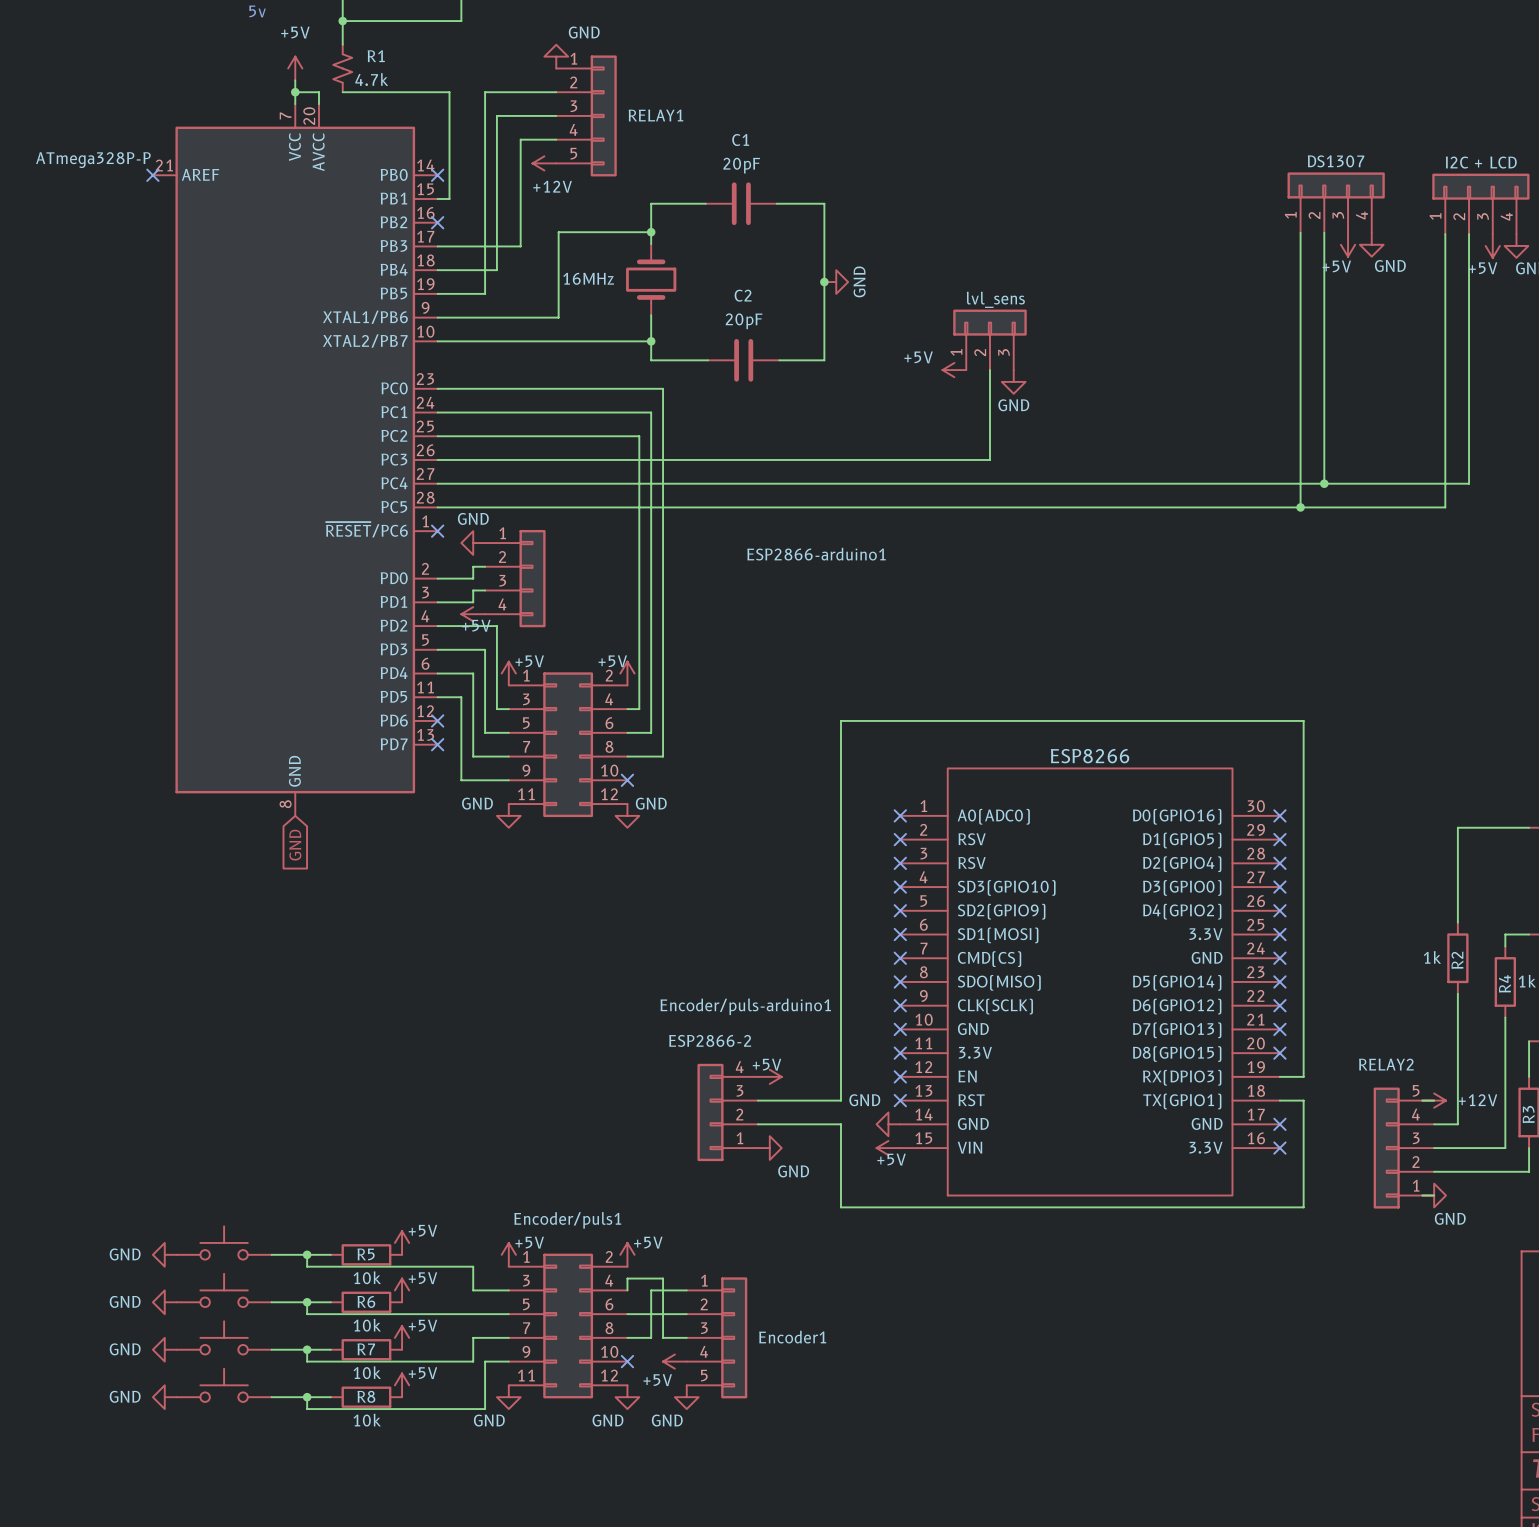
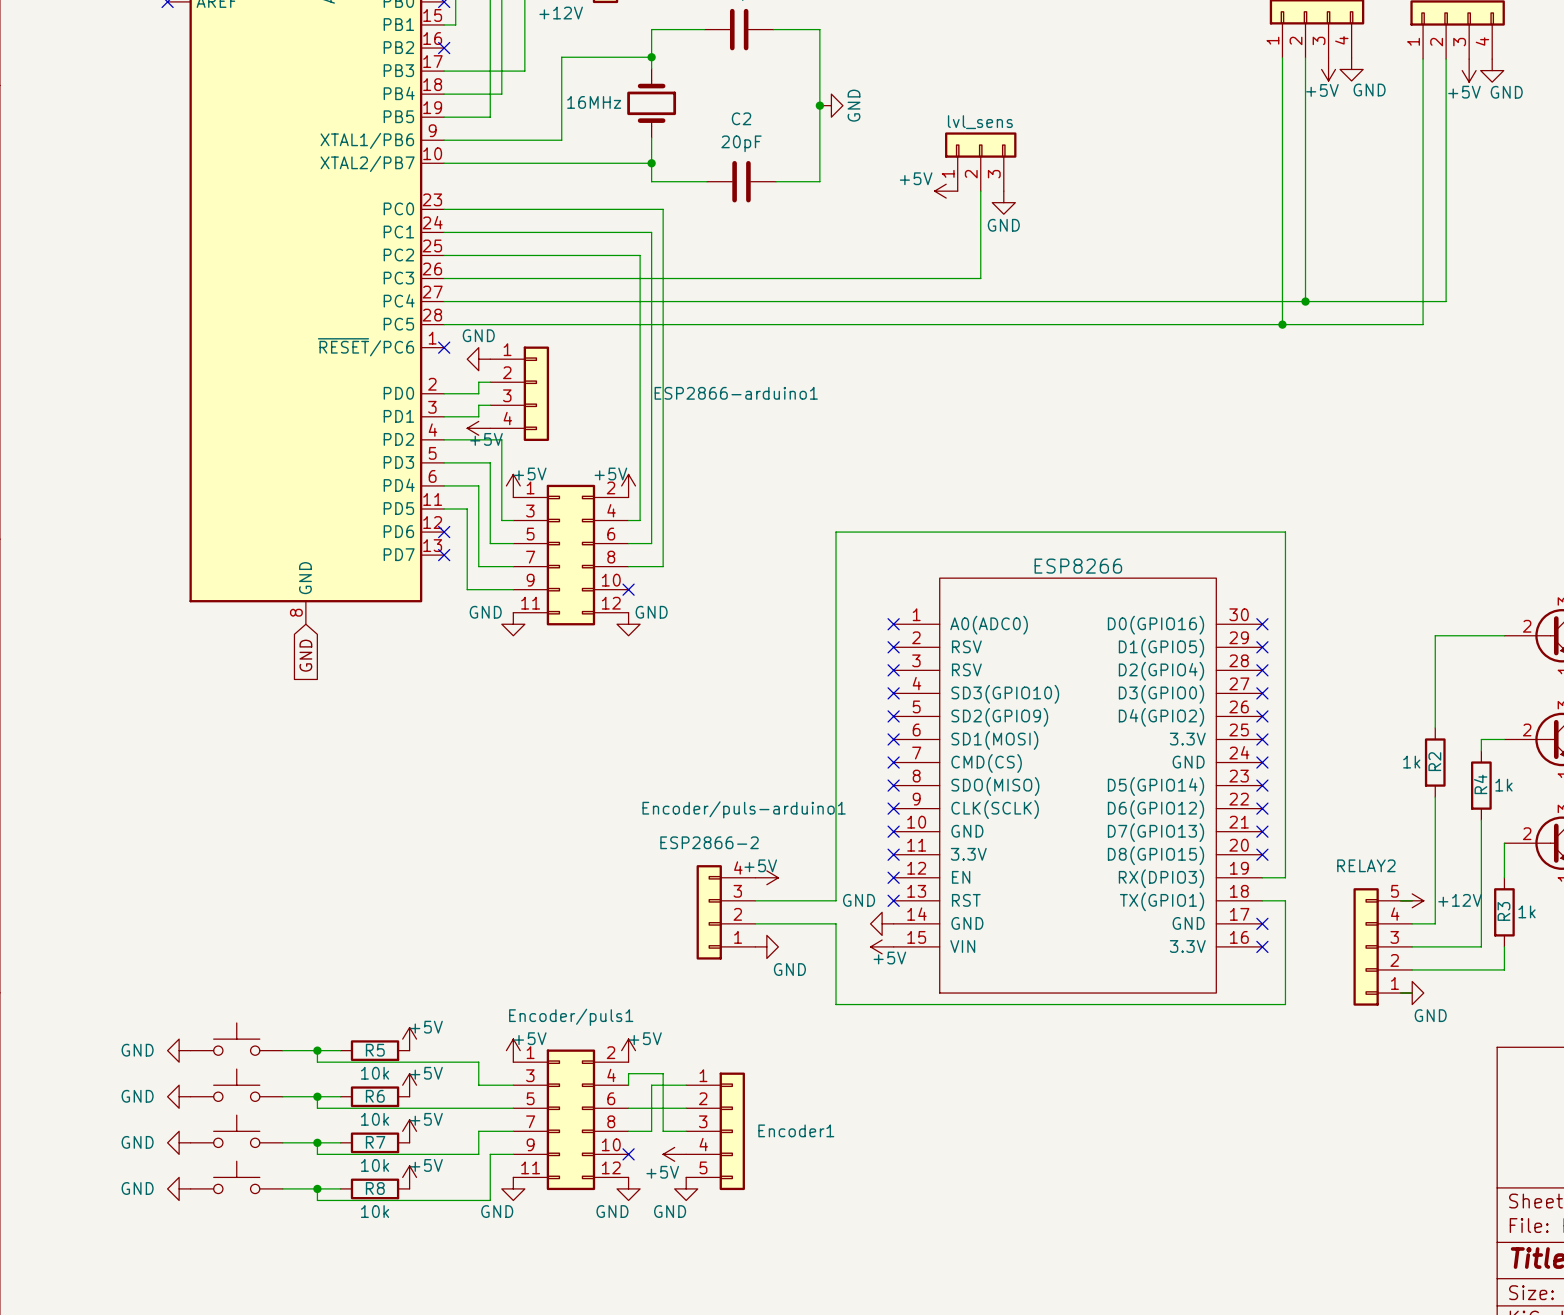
ESP2866-arduino1 name position: ESP2866-arduino1 (816, 554) -> ESP2866-arduino1 (736, 393)

